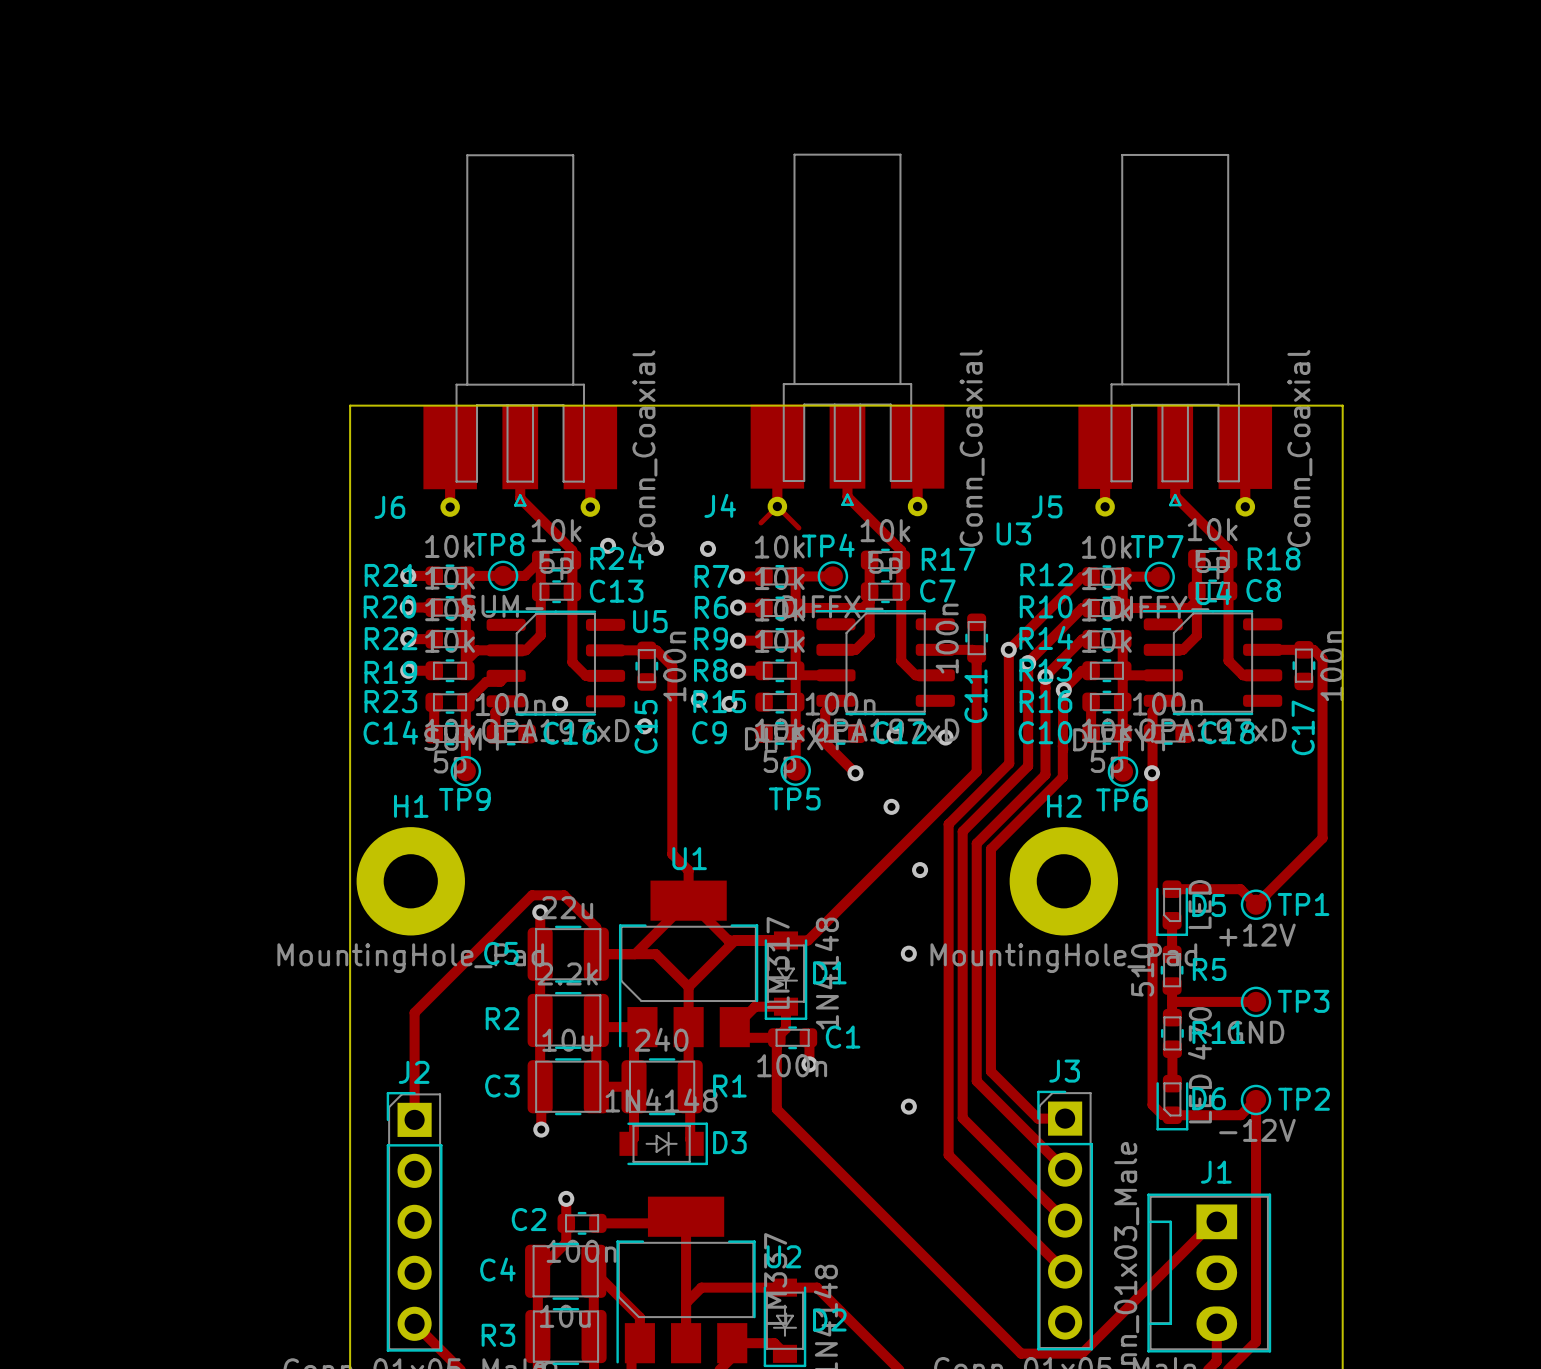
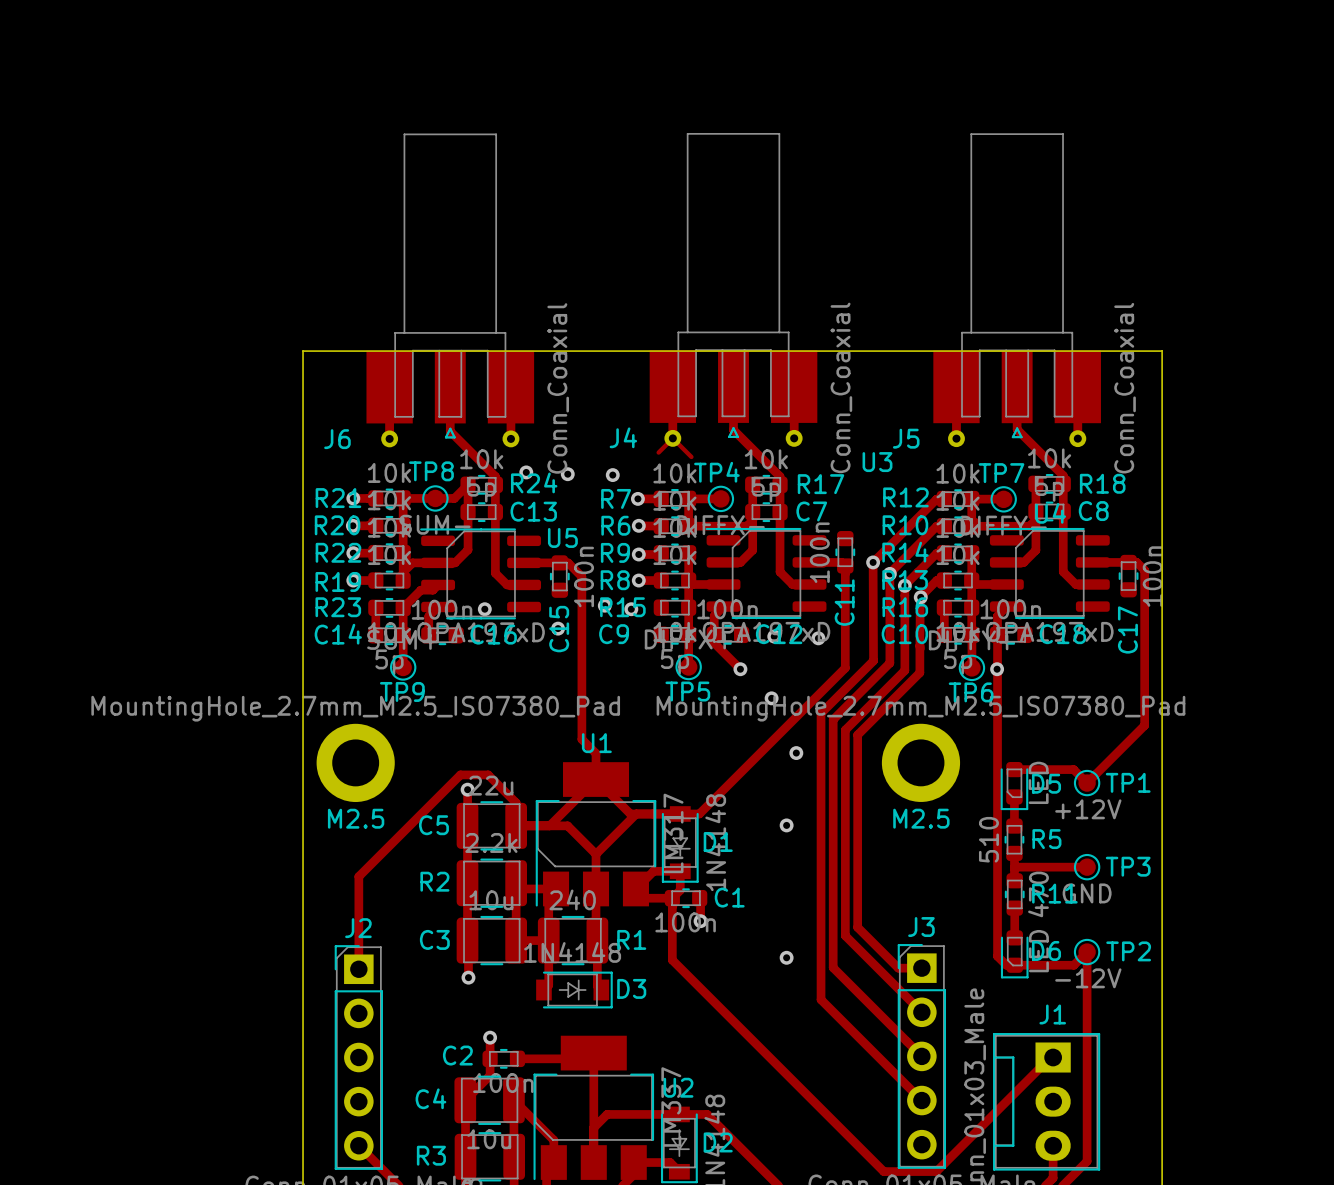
H1: MountingHole_Pad (410, 881) -> none
M2.5: none -> MountingHole_2.7mm_M2.5_ISO7380_Pad (355, 762)
H2: MountingHole_Pad (1063, 881) -> none
M2.5: none -> MountingHole_2.7mm_M2.5_ISO7380_Pad (920, 762)

